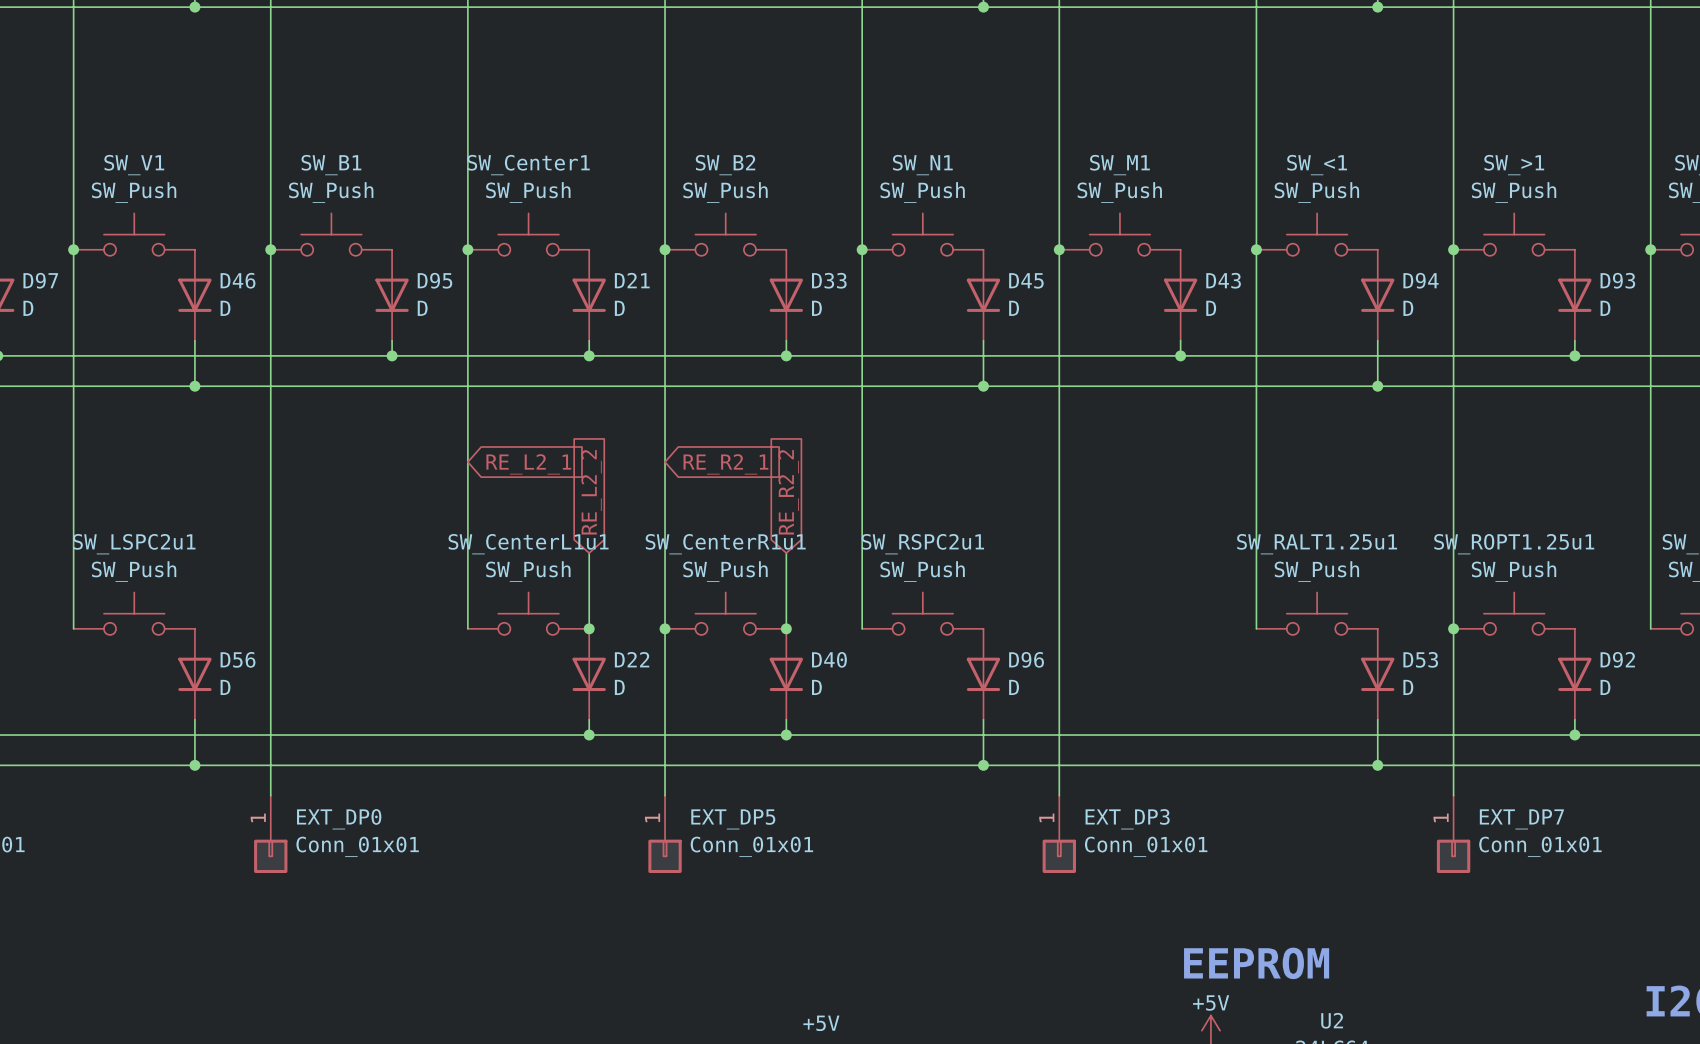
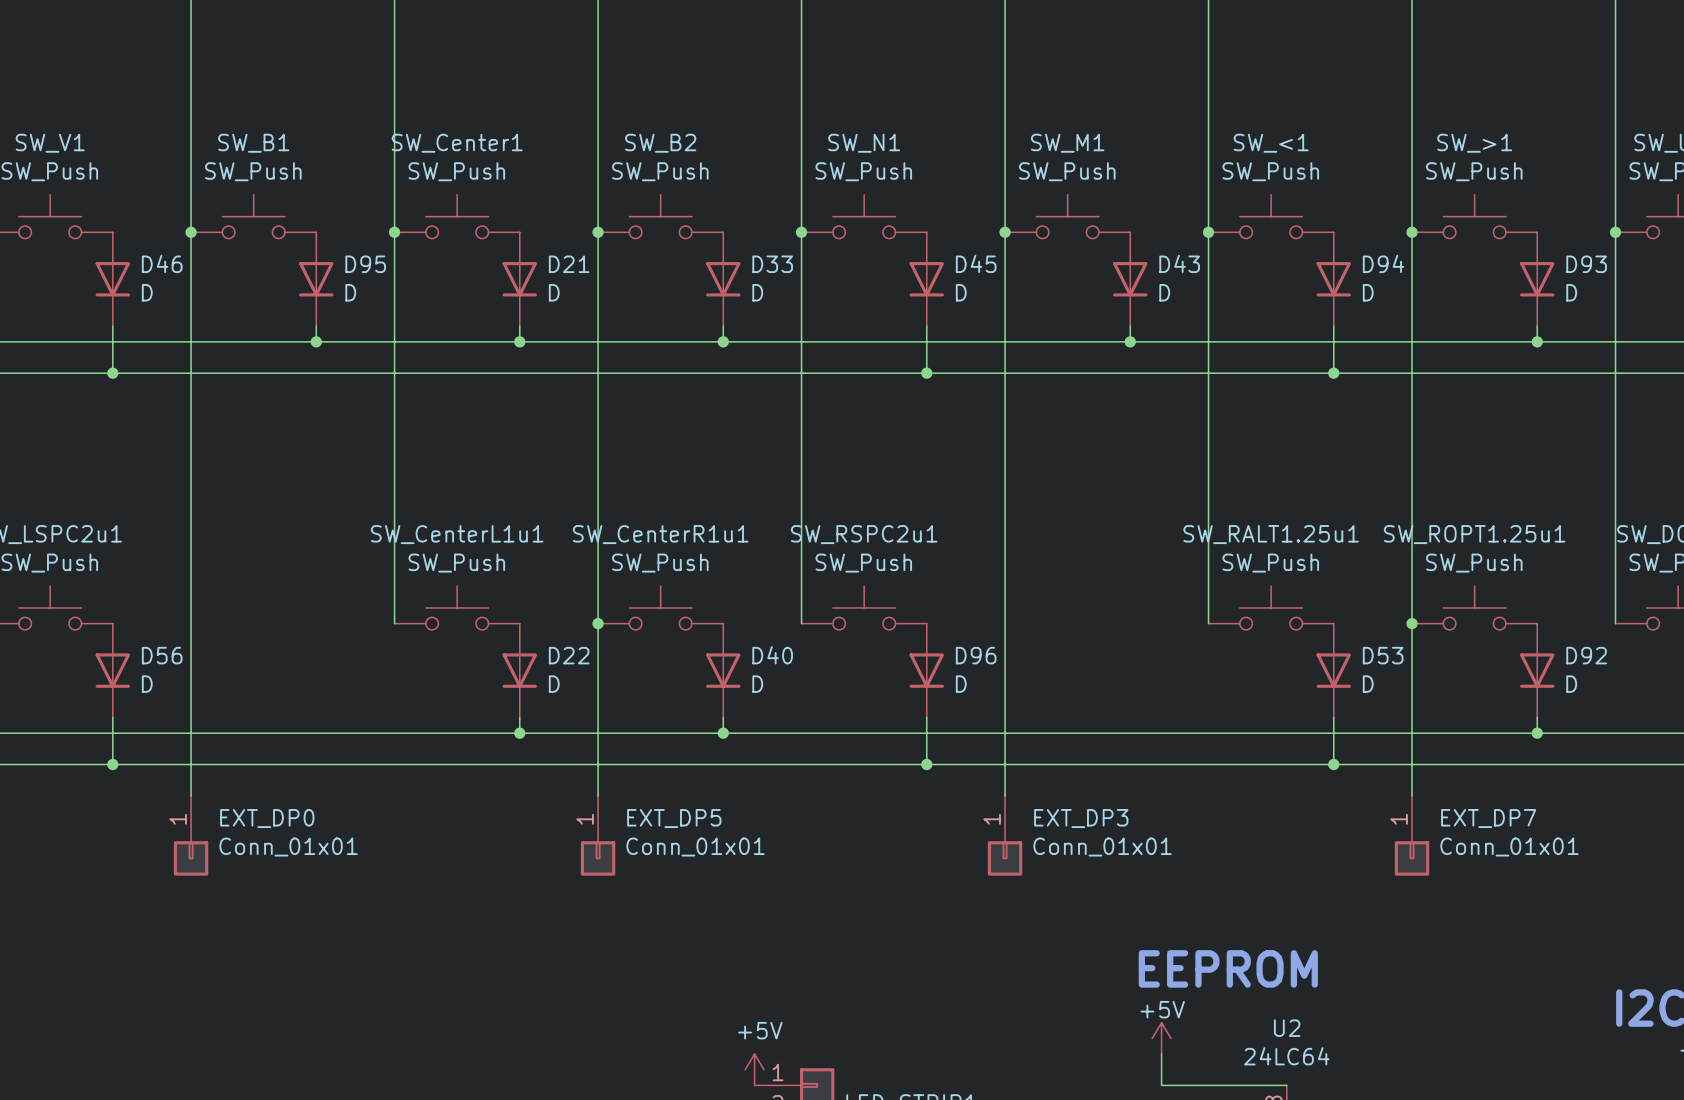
global label: RE_L2_1 (528, 464) -> none
global label: RE_R2_1 (725, 464) -> none
global label: RE_L2_2 (591, 492) -> none
global label: RE_R2_2 (788, 492) -> none
wire: (589, 553) (589, 628) -> none
wire: (786, 553) (786, 628) -> none
junction: (589, 628) -> none
junction: (786, 628) -> none

